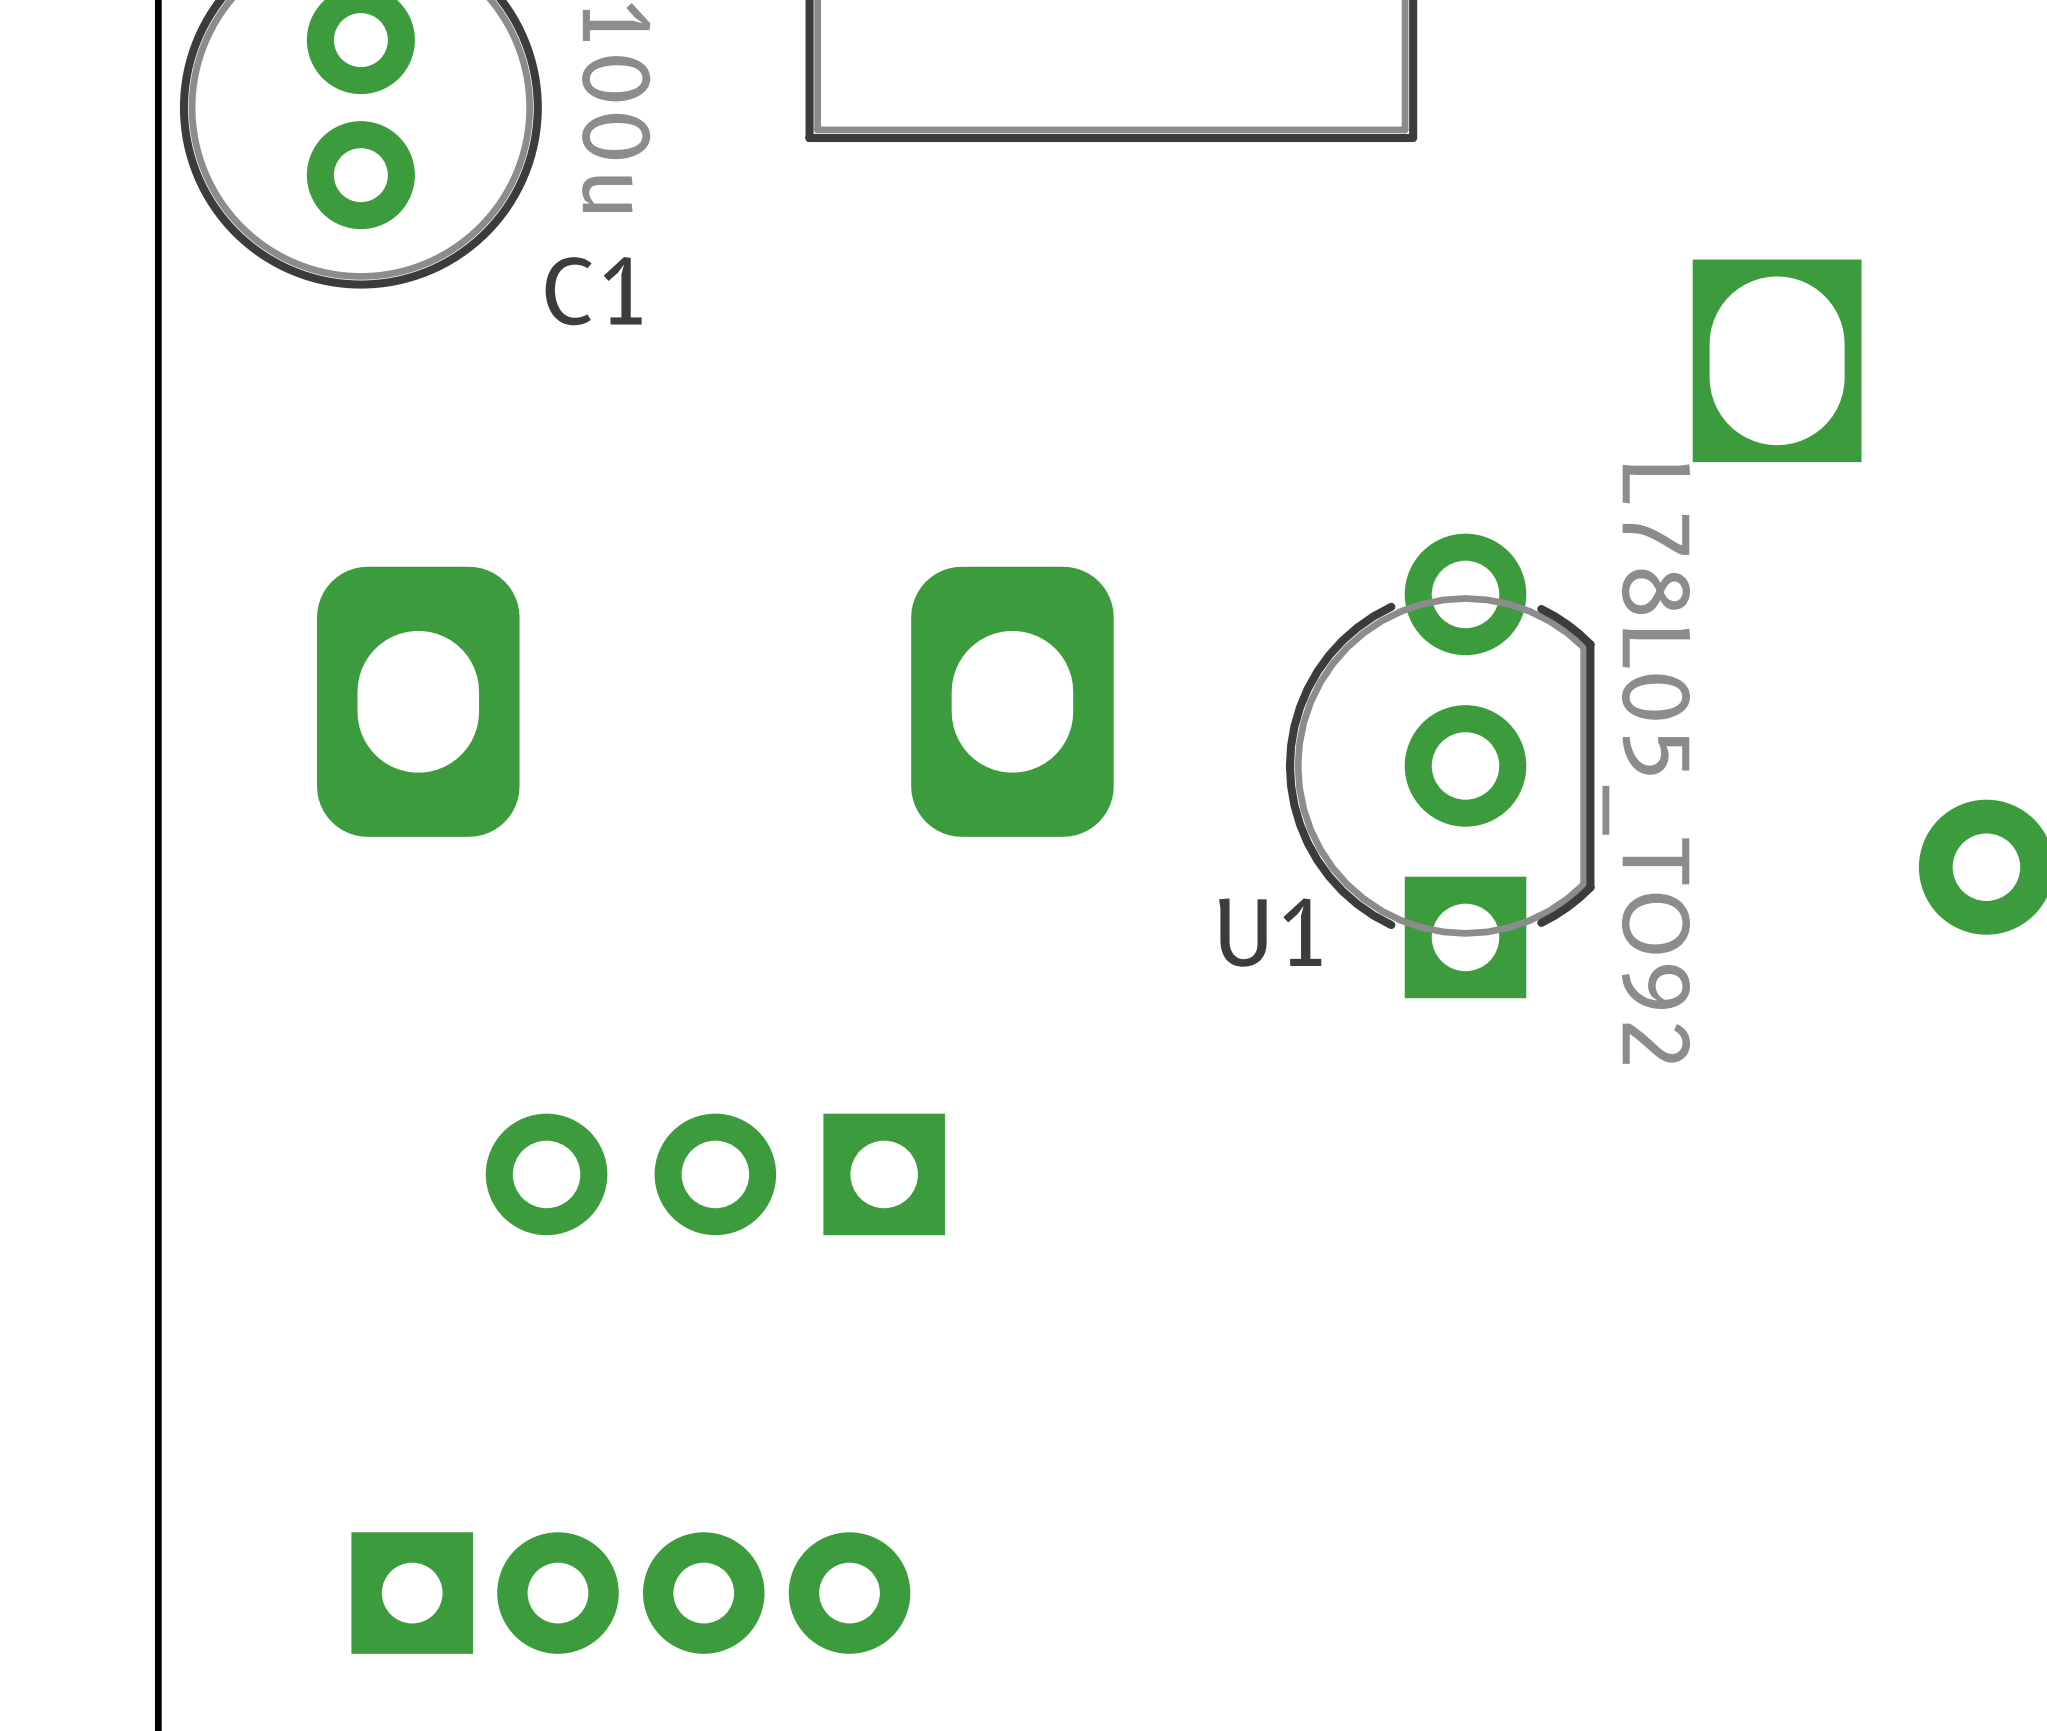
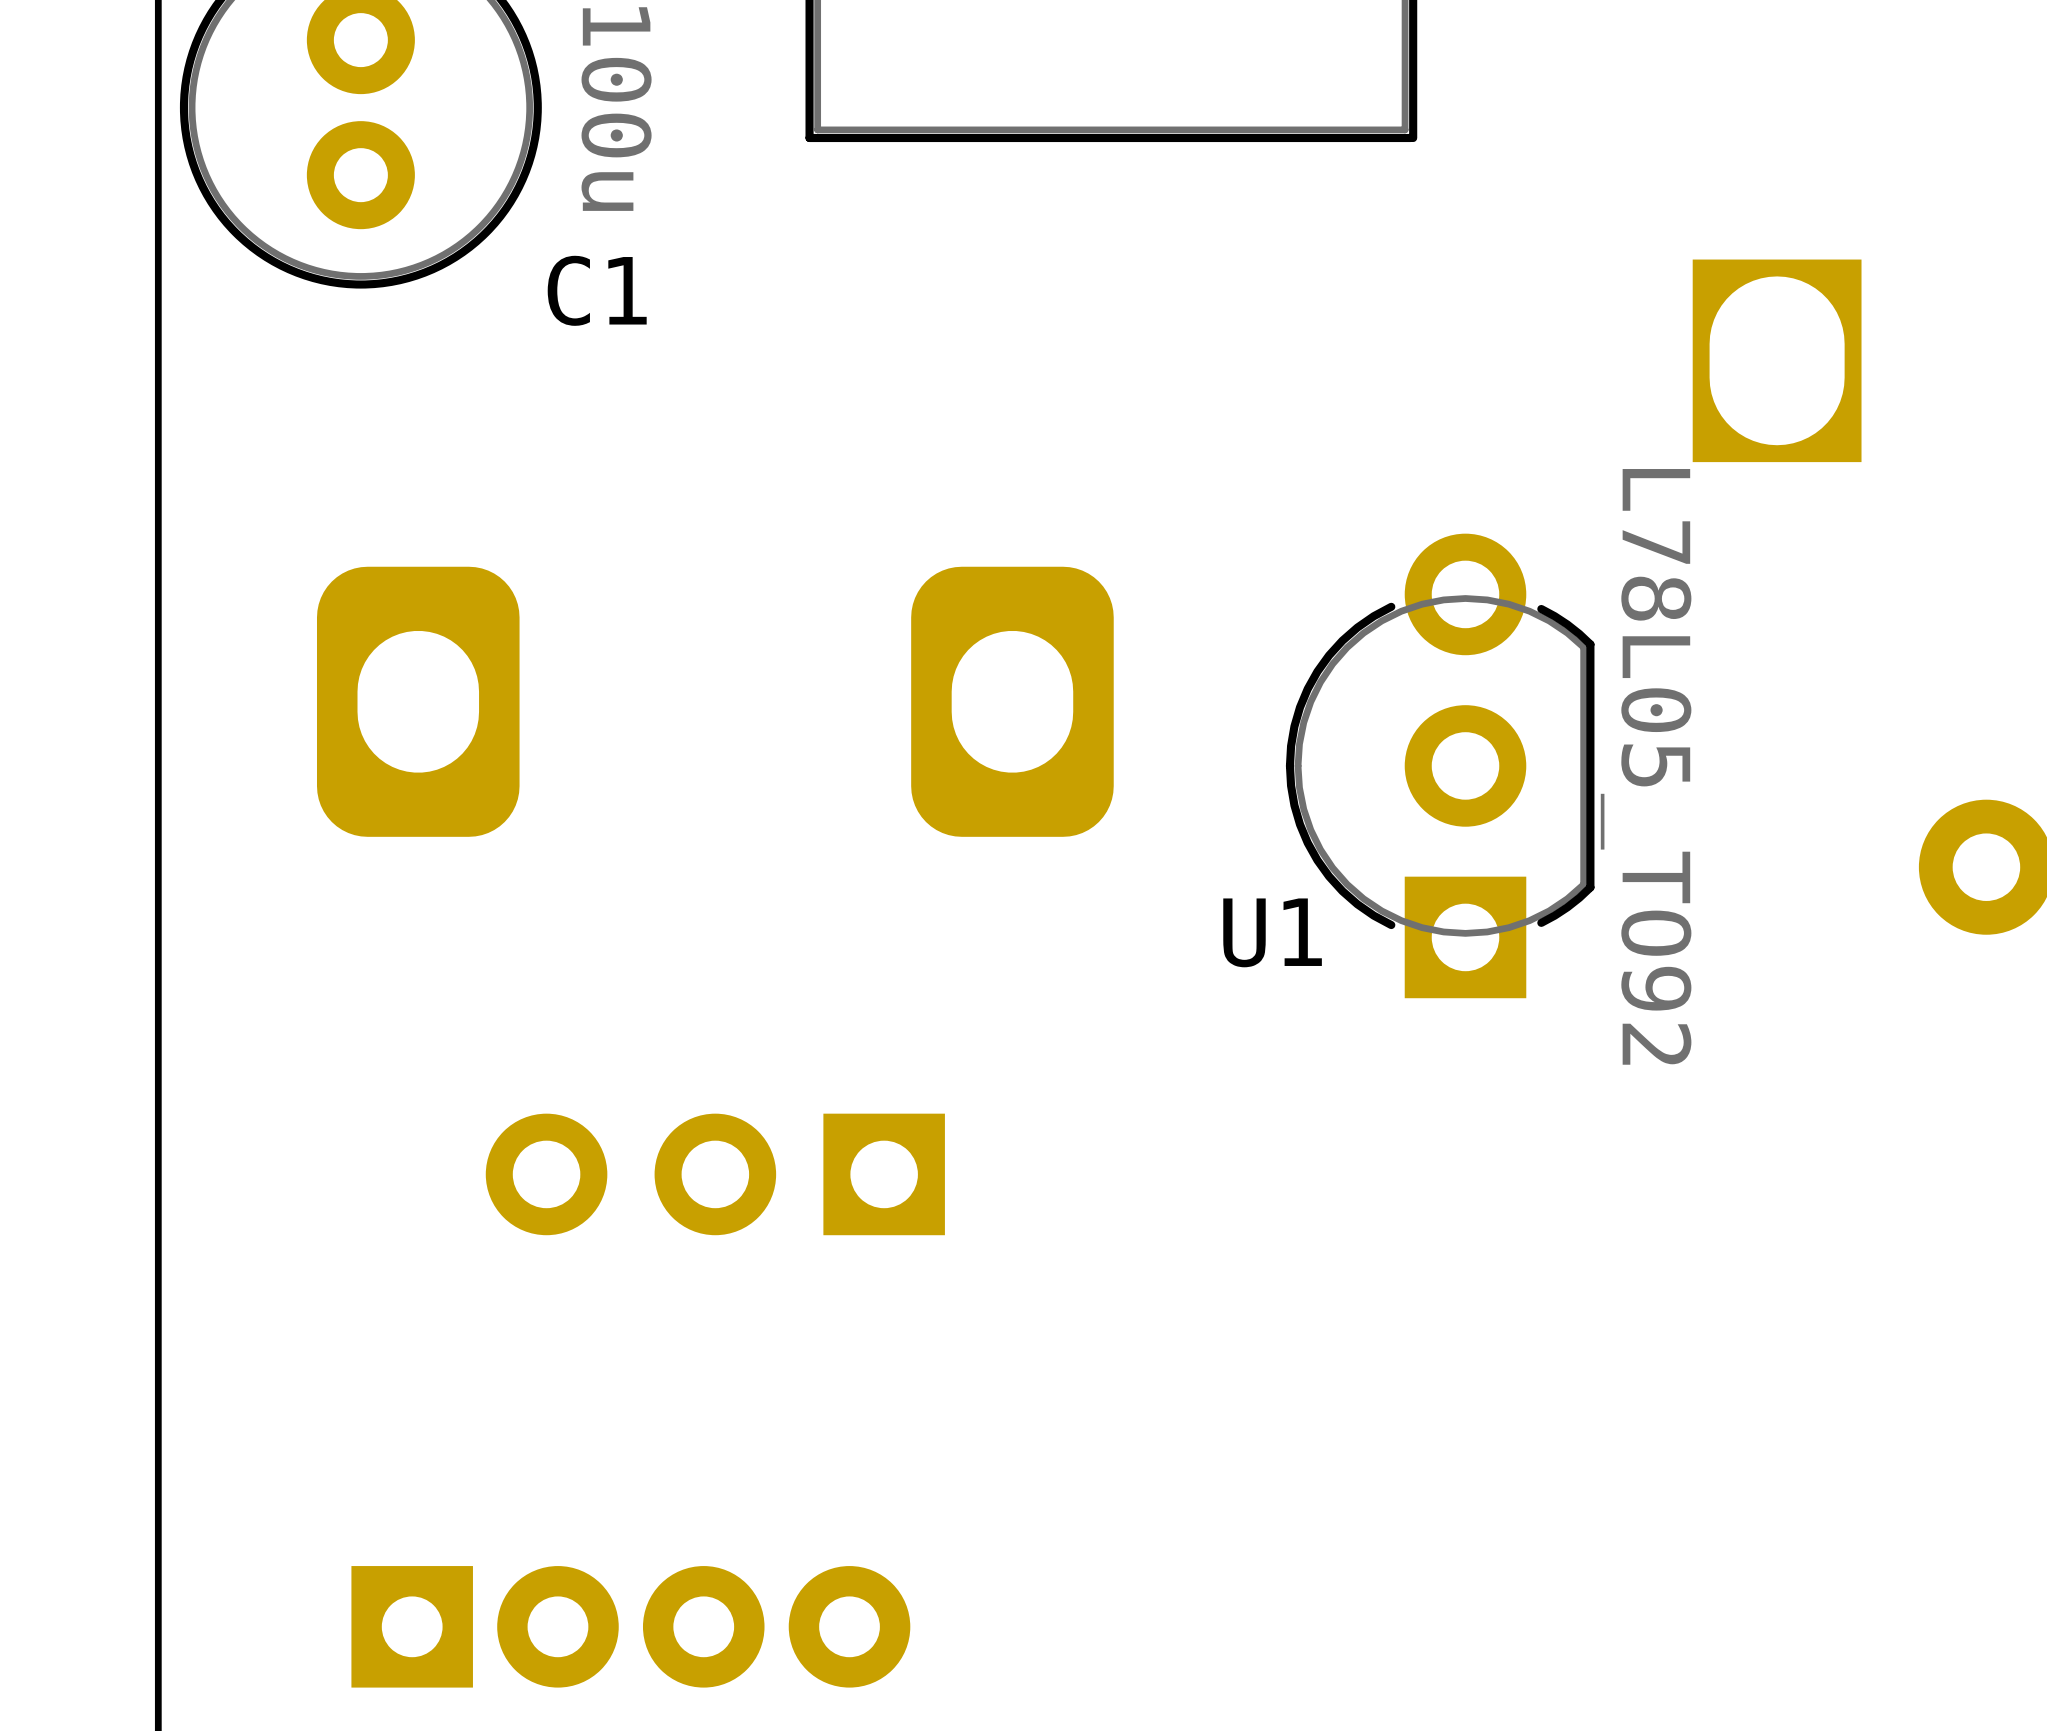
part position: (630, 1593) -> (630, 1626)

